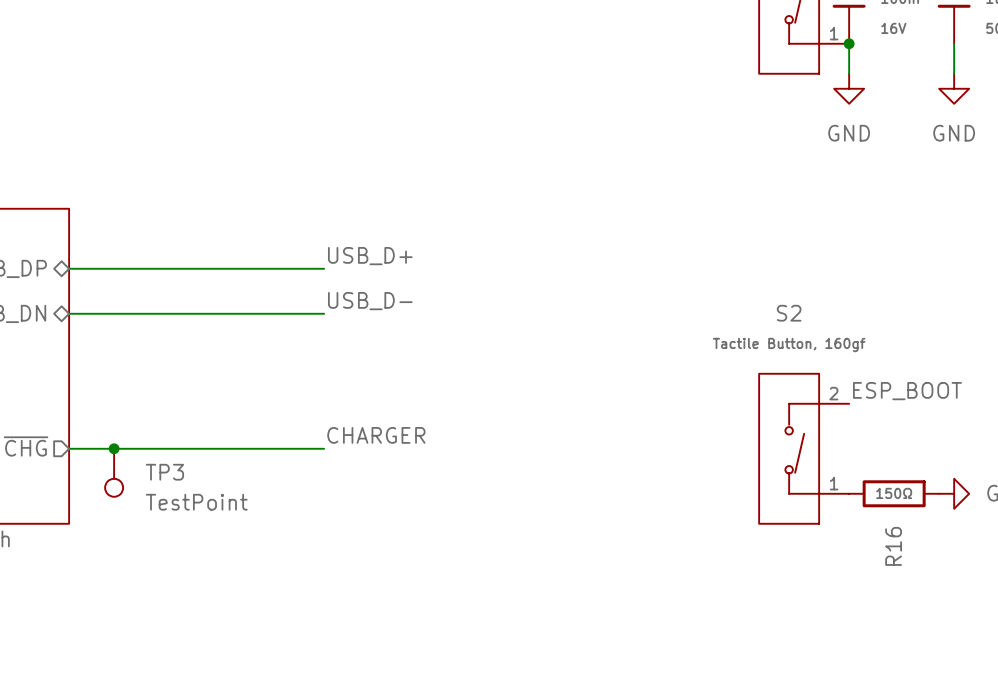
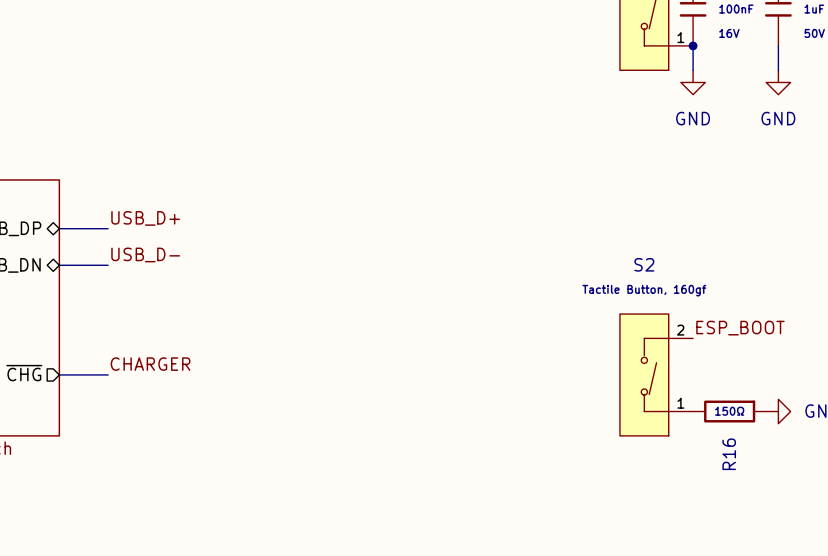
label position: USB_D+ (370, 256) -> USB_D+ (145, 218)
wire: (129, 268) (324, 268) -> none
label position: USB_D- (370, 301) -> USB_D- (145, 254)
wire: (129, 313) (324, 313) -> none
label position: CHARGER (376, 435) -> CHARGER (150, 364)
junction: (114, 448) -> none
wire: (129, 448) (324, 448) -> none
TP3: TestPoint (114, 472) -> none

